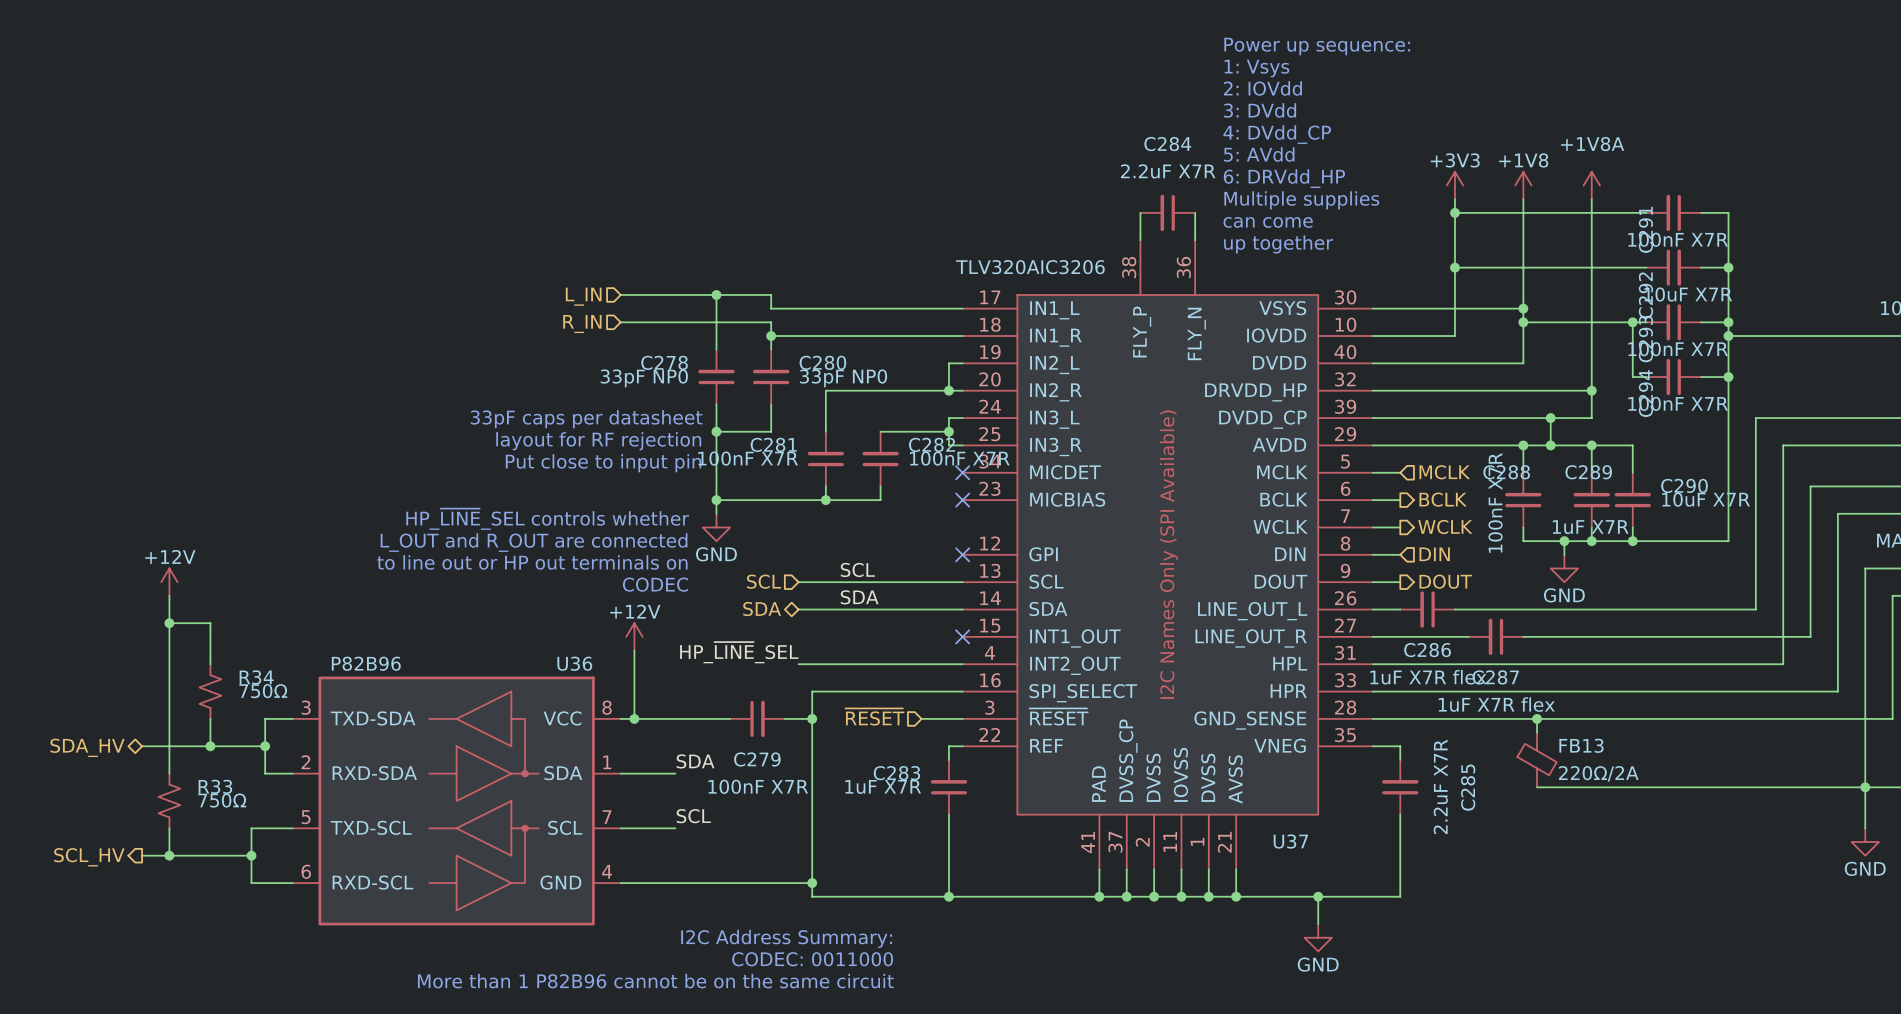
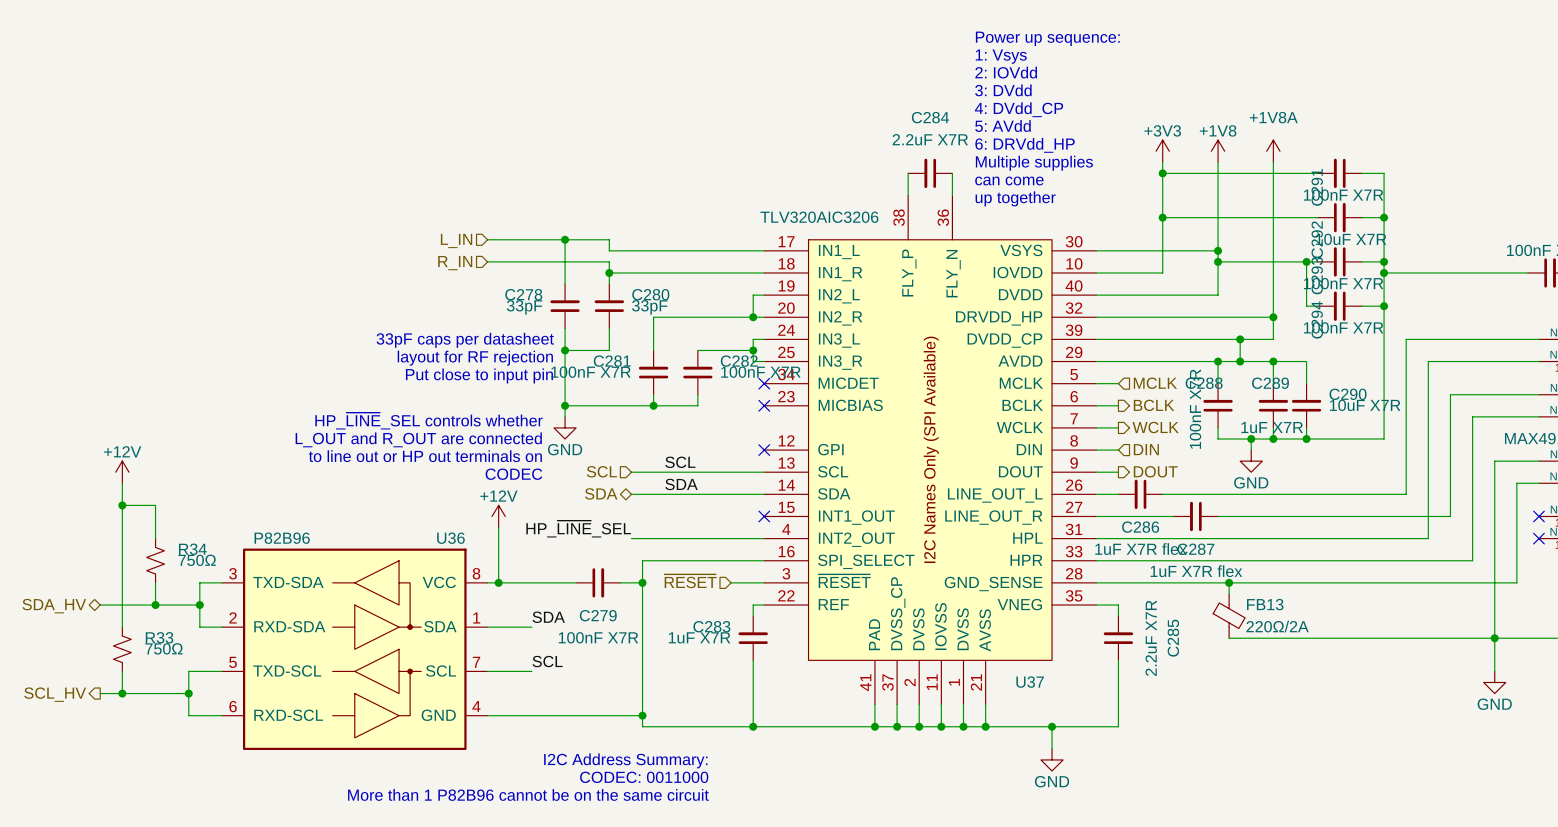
C278 value: 33pF NP0 (644, 378) -> 33pF (524, 307)
C280 value: 33pF NP0 (843, 378) -> 33pF (649, 307)

